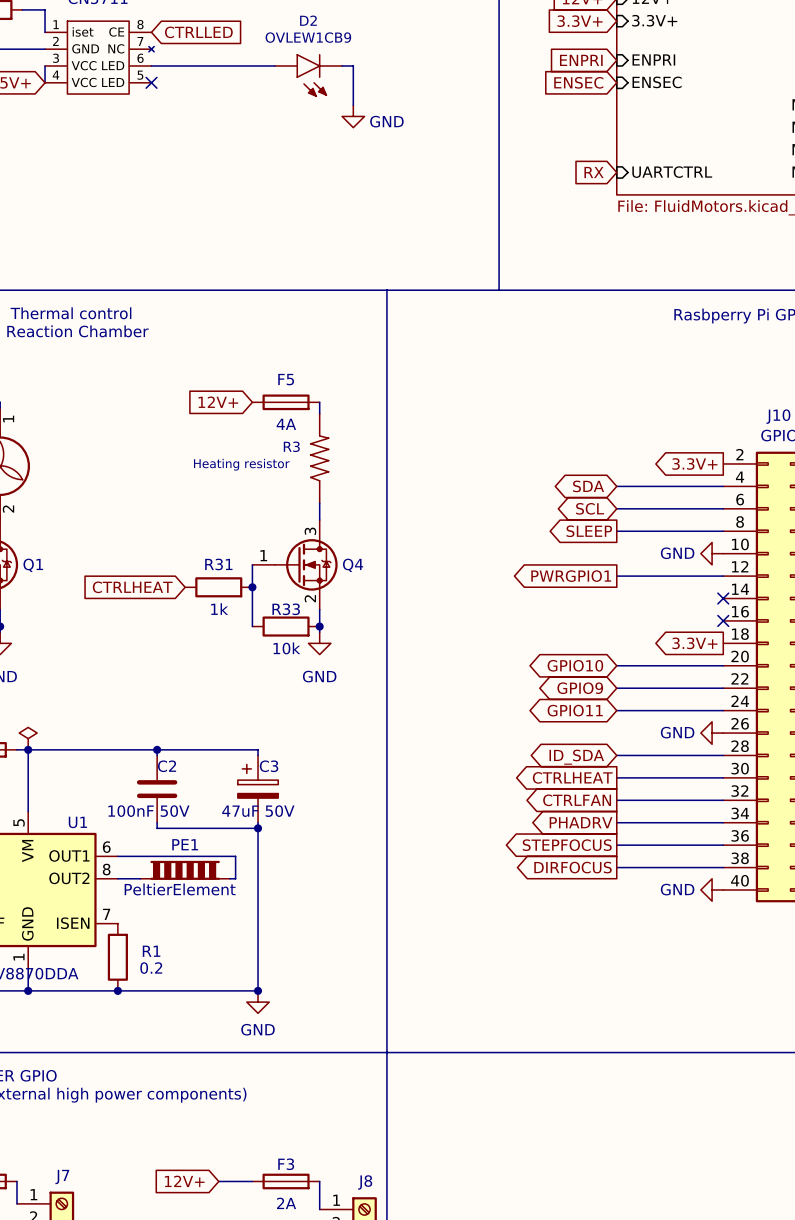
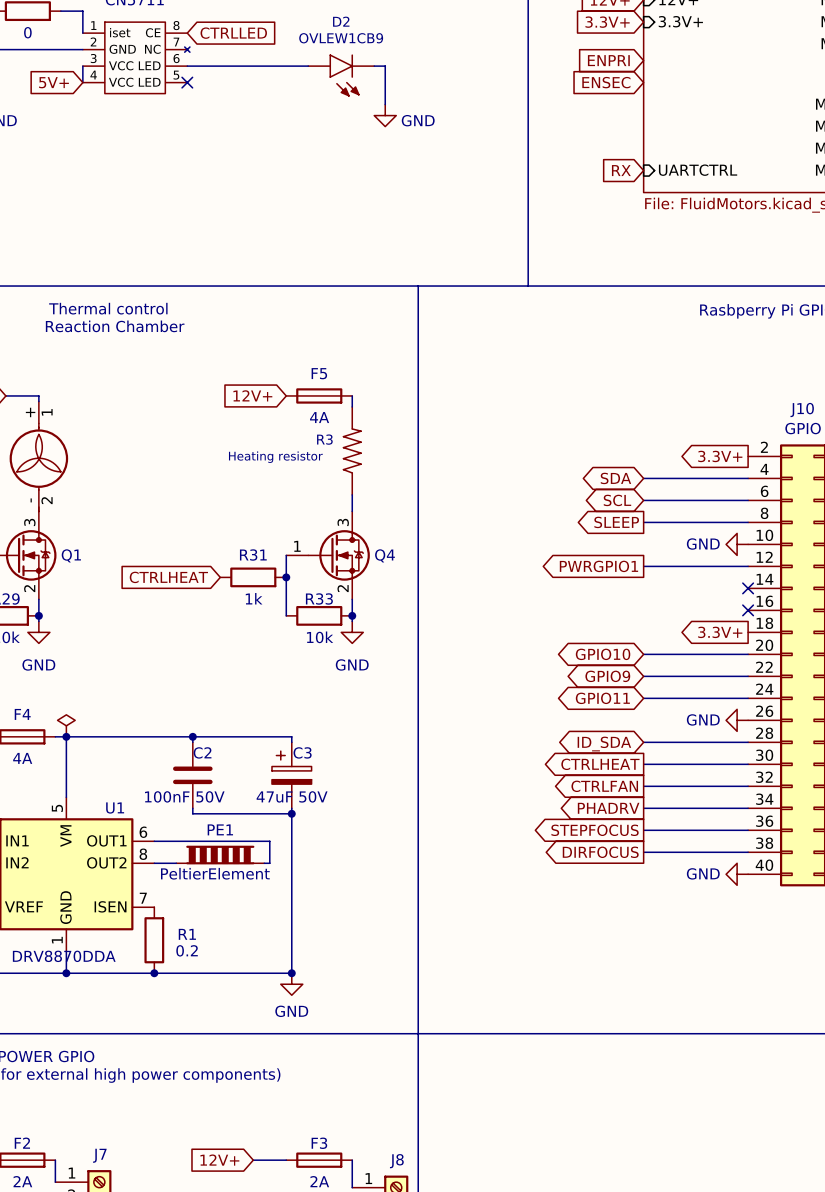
sheet pin: ENPRI (653, 59) -> none
sheet pin: ENSEC (657, 82) -> none

